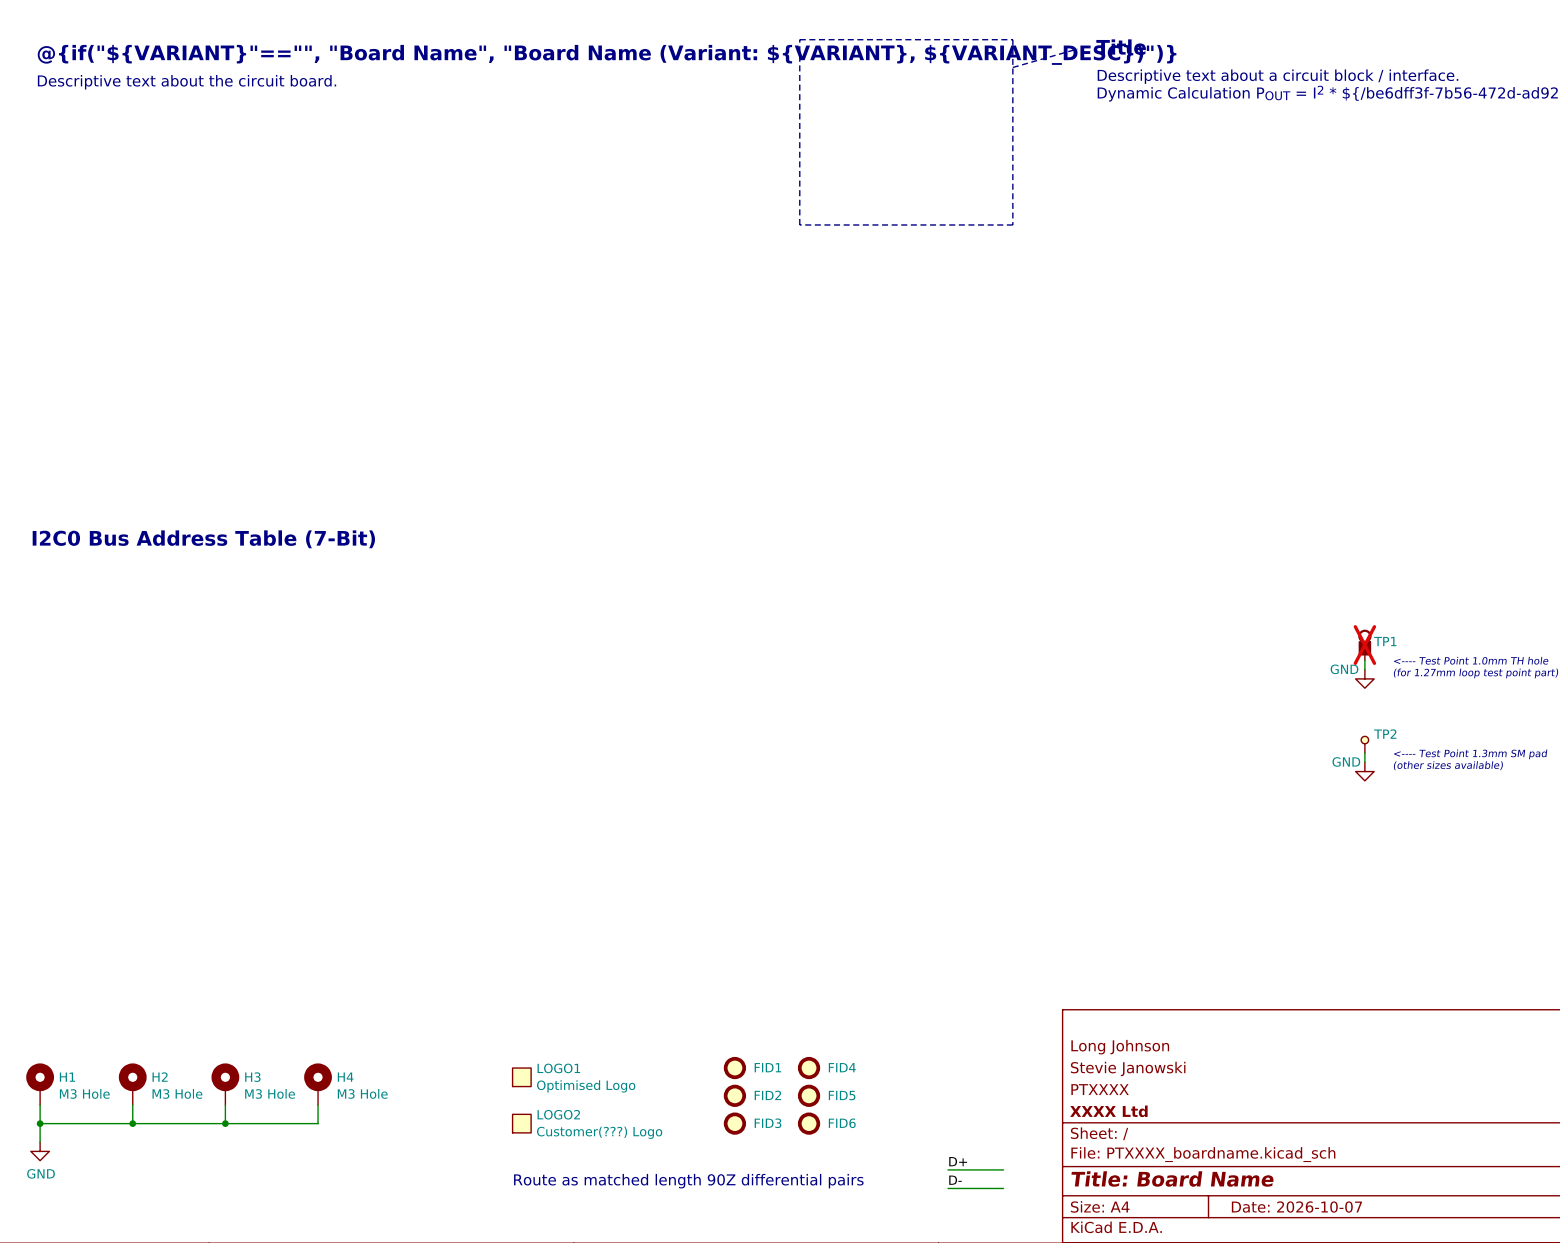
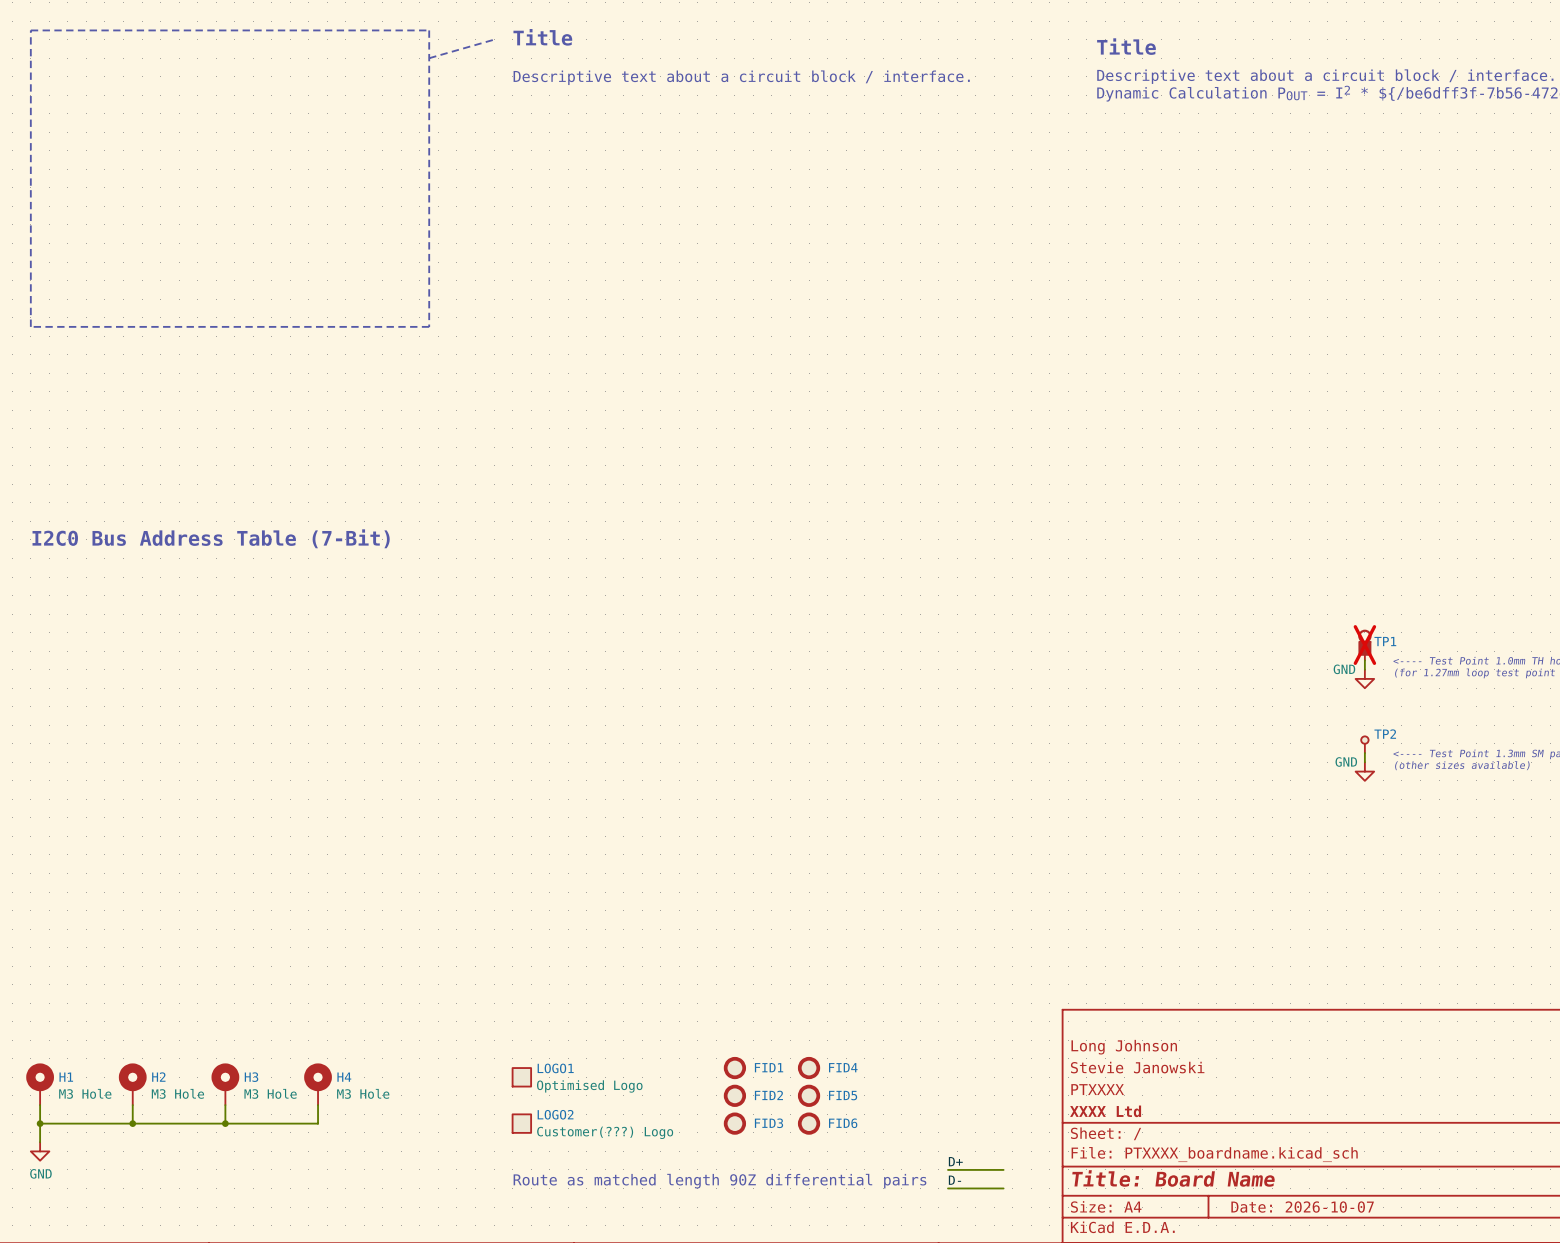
line: none -> (30, 30) (429, 30) (429, 326) (30, 326) (30, 30)
text: none -> Title (542, 37)
line: none -> (494, 39) (429, 58)
line: (799, 39) (1012, 39) (1012, 224) (799, 224) (799, 39) -> none
line: (1077, 48) (1012, 67) -> none
text: @{if("${VARIANT}"=="", "Board Name", "Board Name (Variant: ${VARIANT}, ${VARIANT_DESC})")} (607, 54) -> none
text: none -> Descriptive text about a circuit block / interface. (741, 77)
text: Descriptive text about the circuit board. (187, 82) -> none

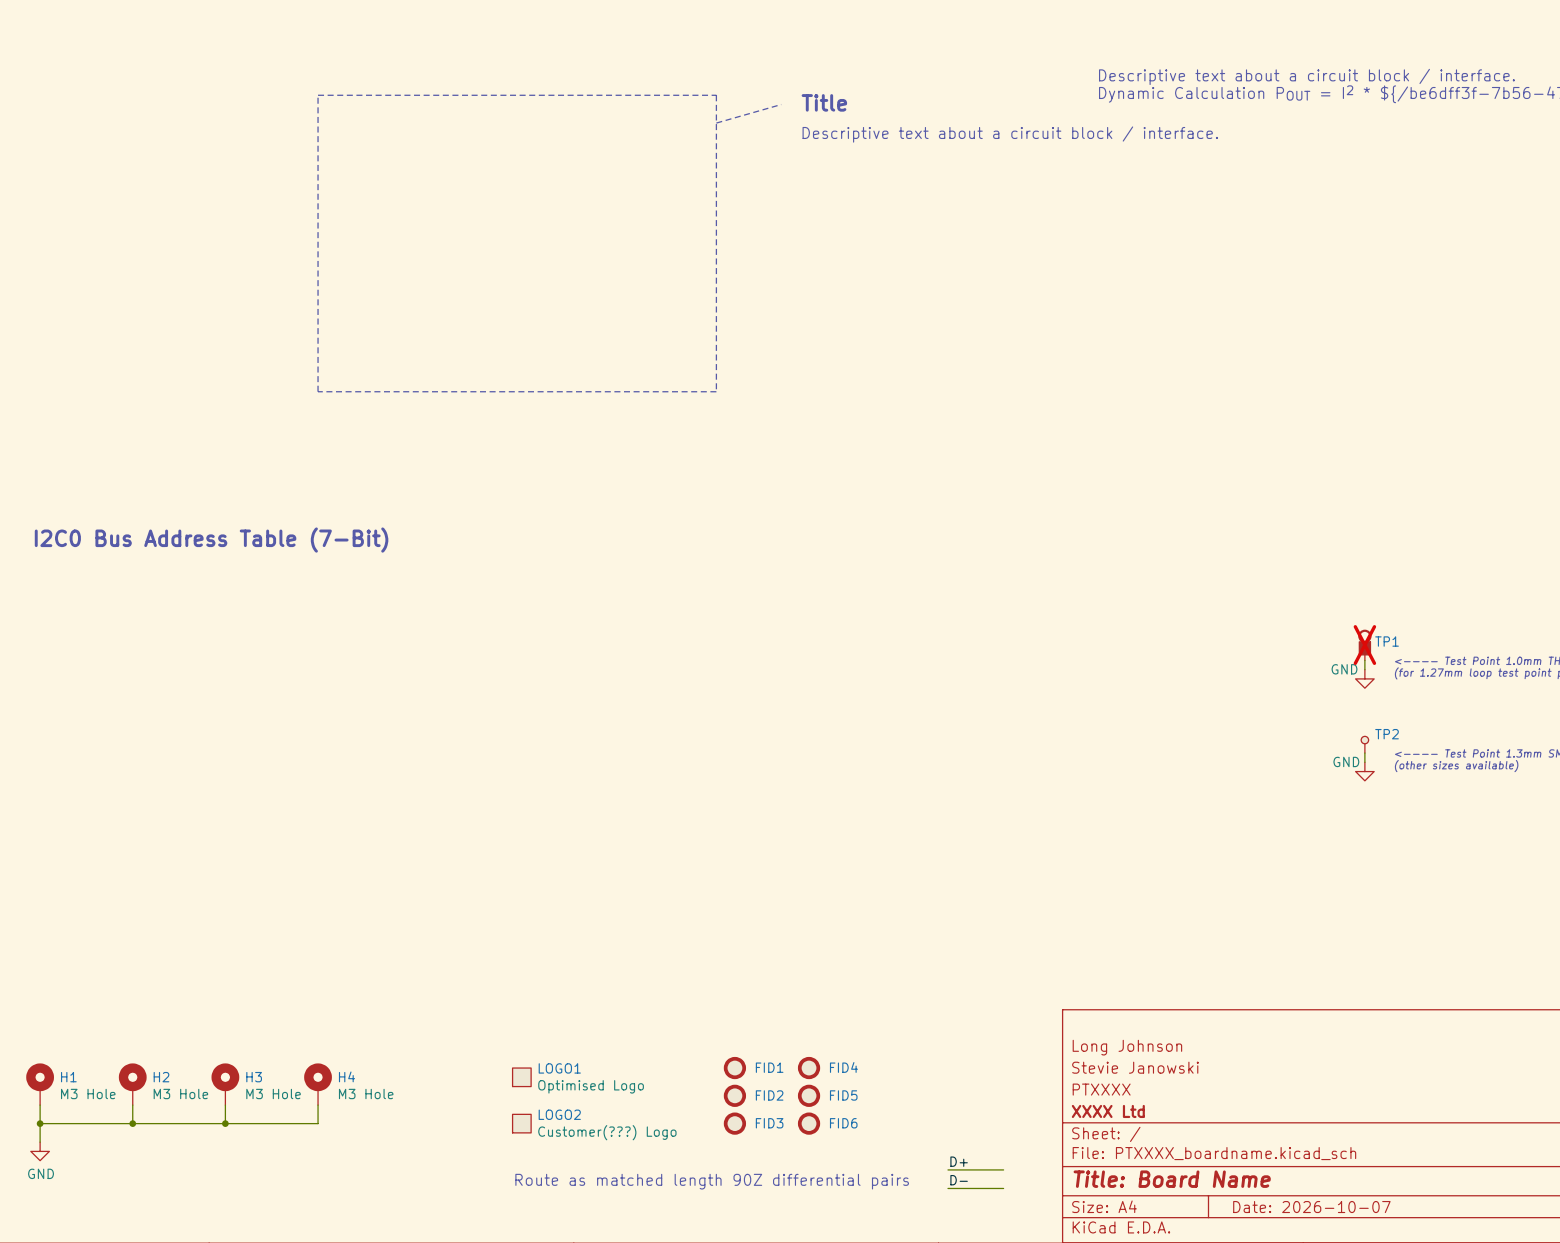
line: (30, 30) (429, 30) (429, 326) (30, 326) (30, 30) -> none
text: Title (542, 37) -> none
line: (494, 39) (429, 58) -> none
text: Title (1126, 46) -> none
text: Descriptive text about a circuit block / interface. (741, 77) -> none
line: none -> (318, 95) (716, 95) (716, 391) (318, 391) (318, 95)
text: none -> Title (824, 102)
line: none -> (781, 104) (716, 123)
text: none -> Descriptive text about a circuit block / interface. (1010, 134)

